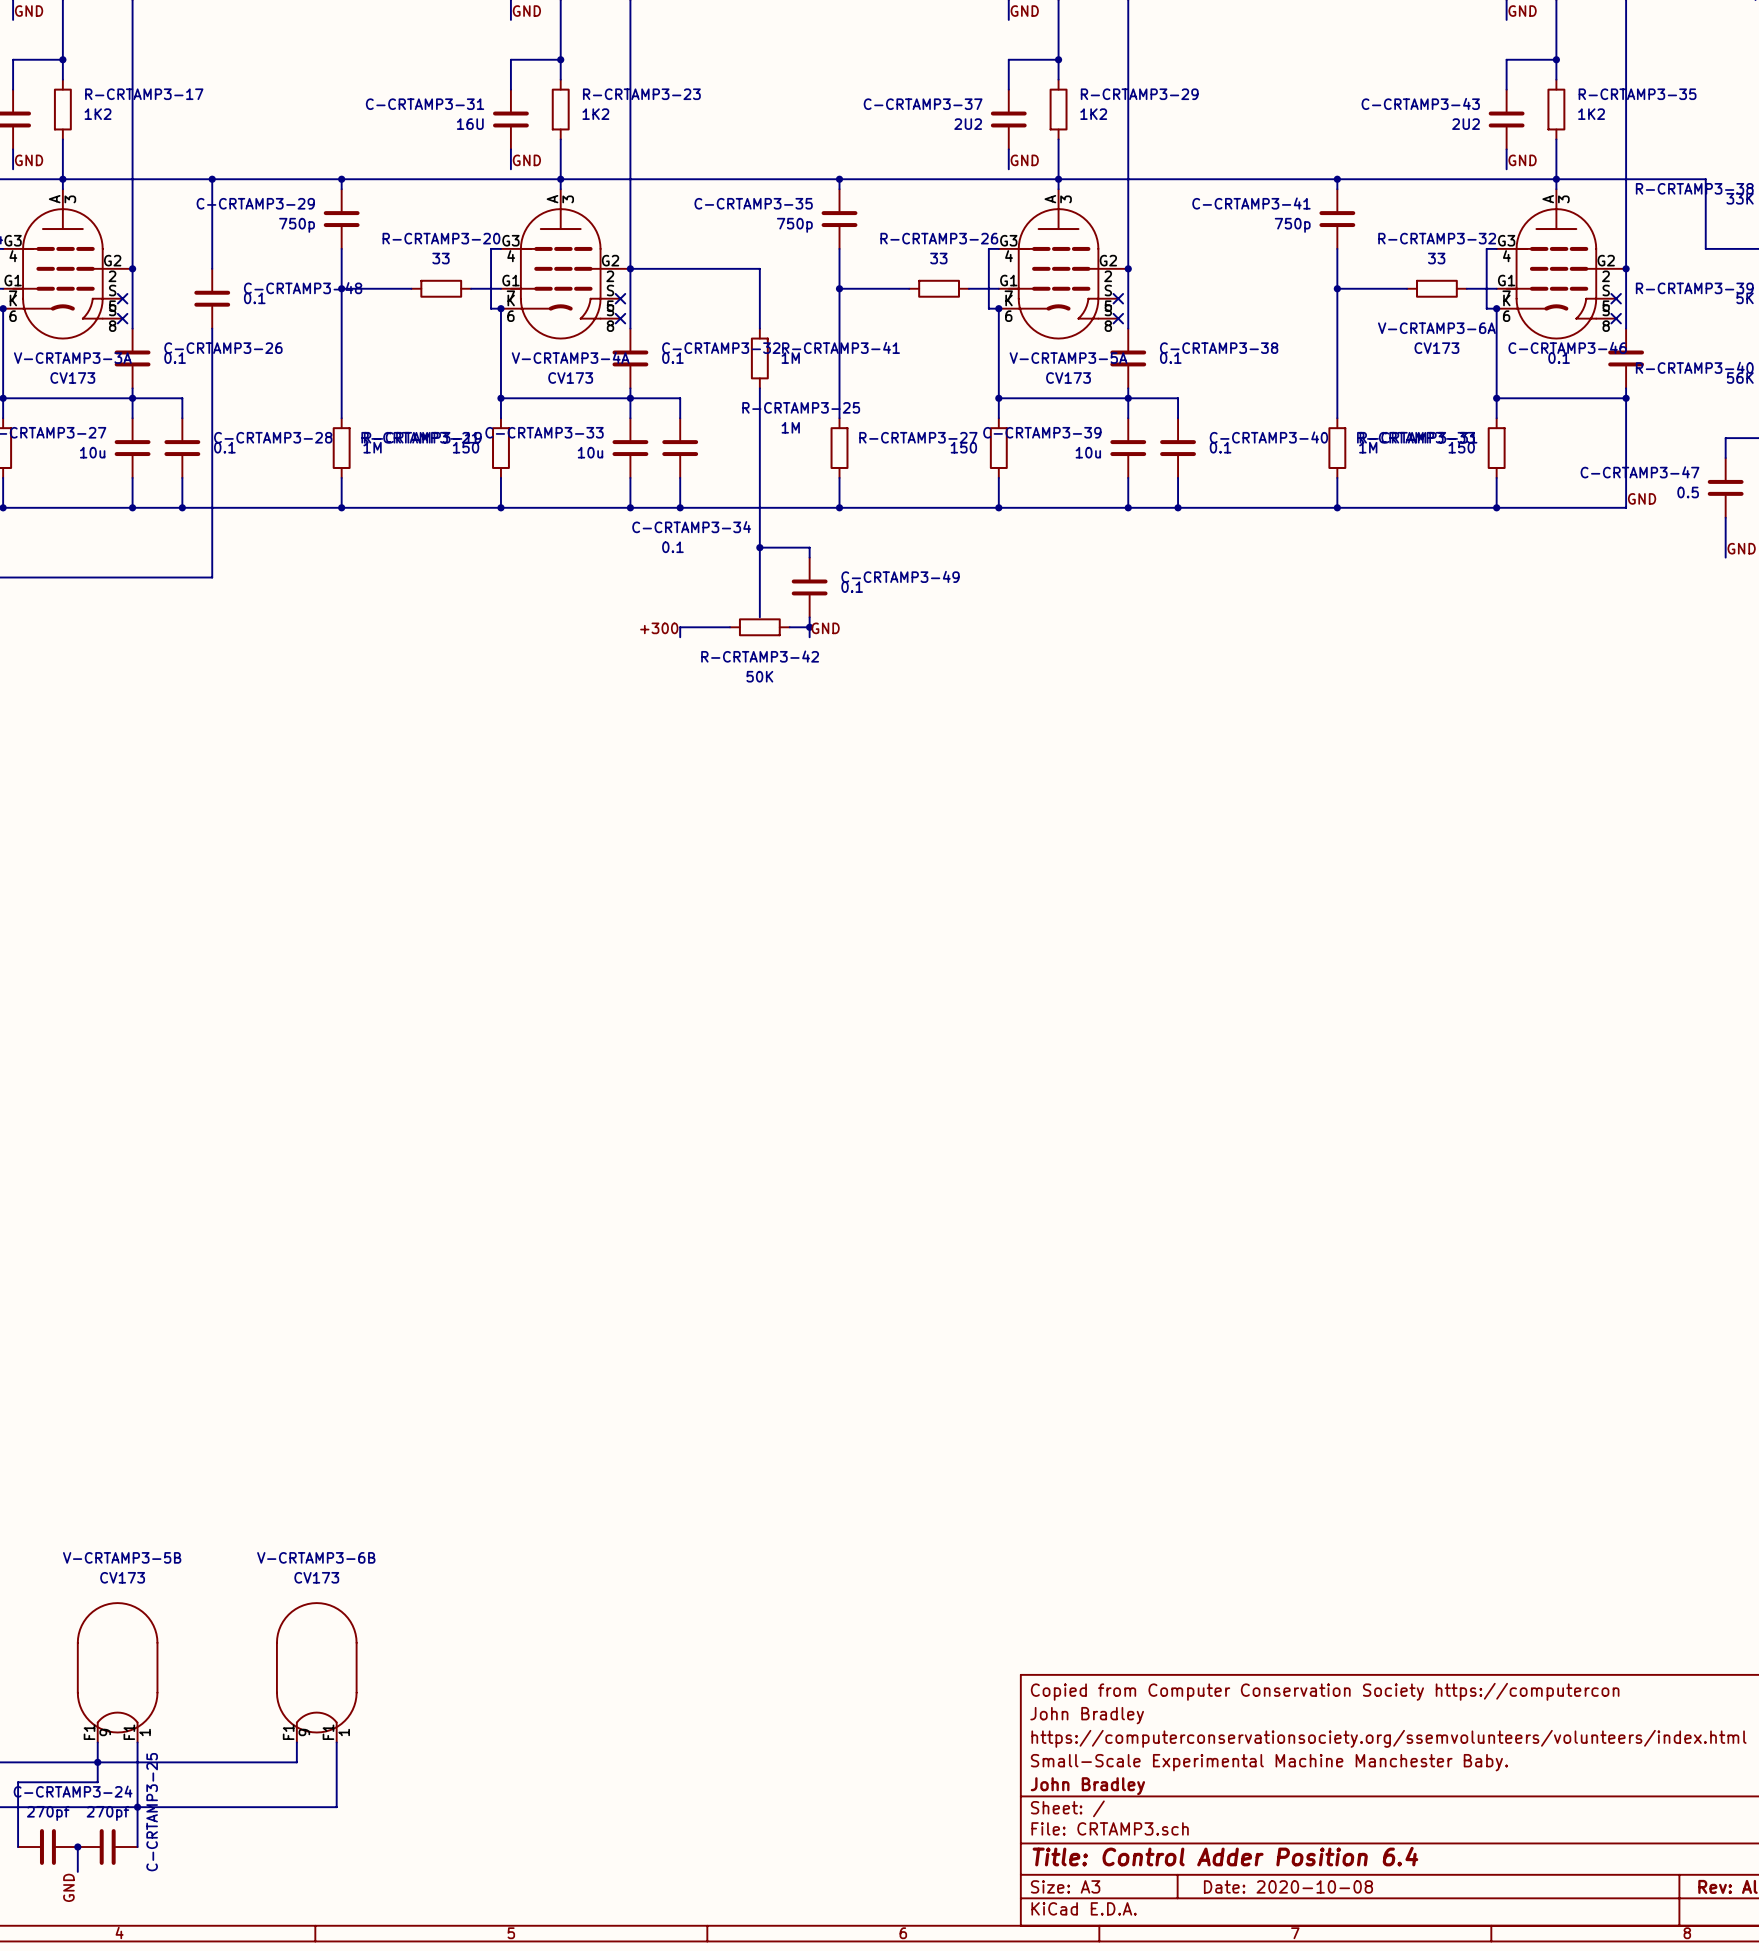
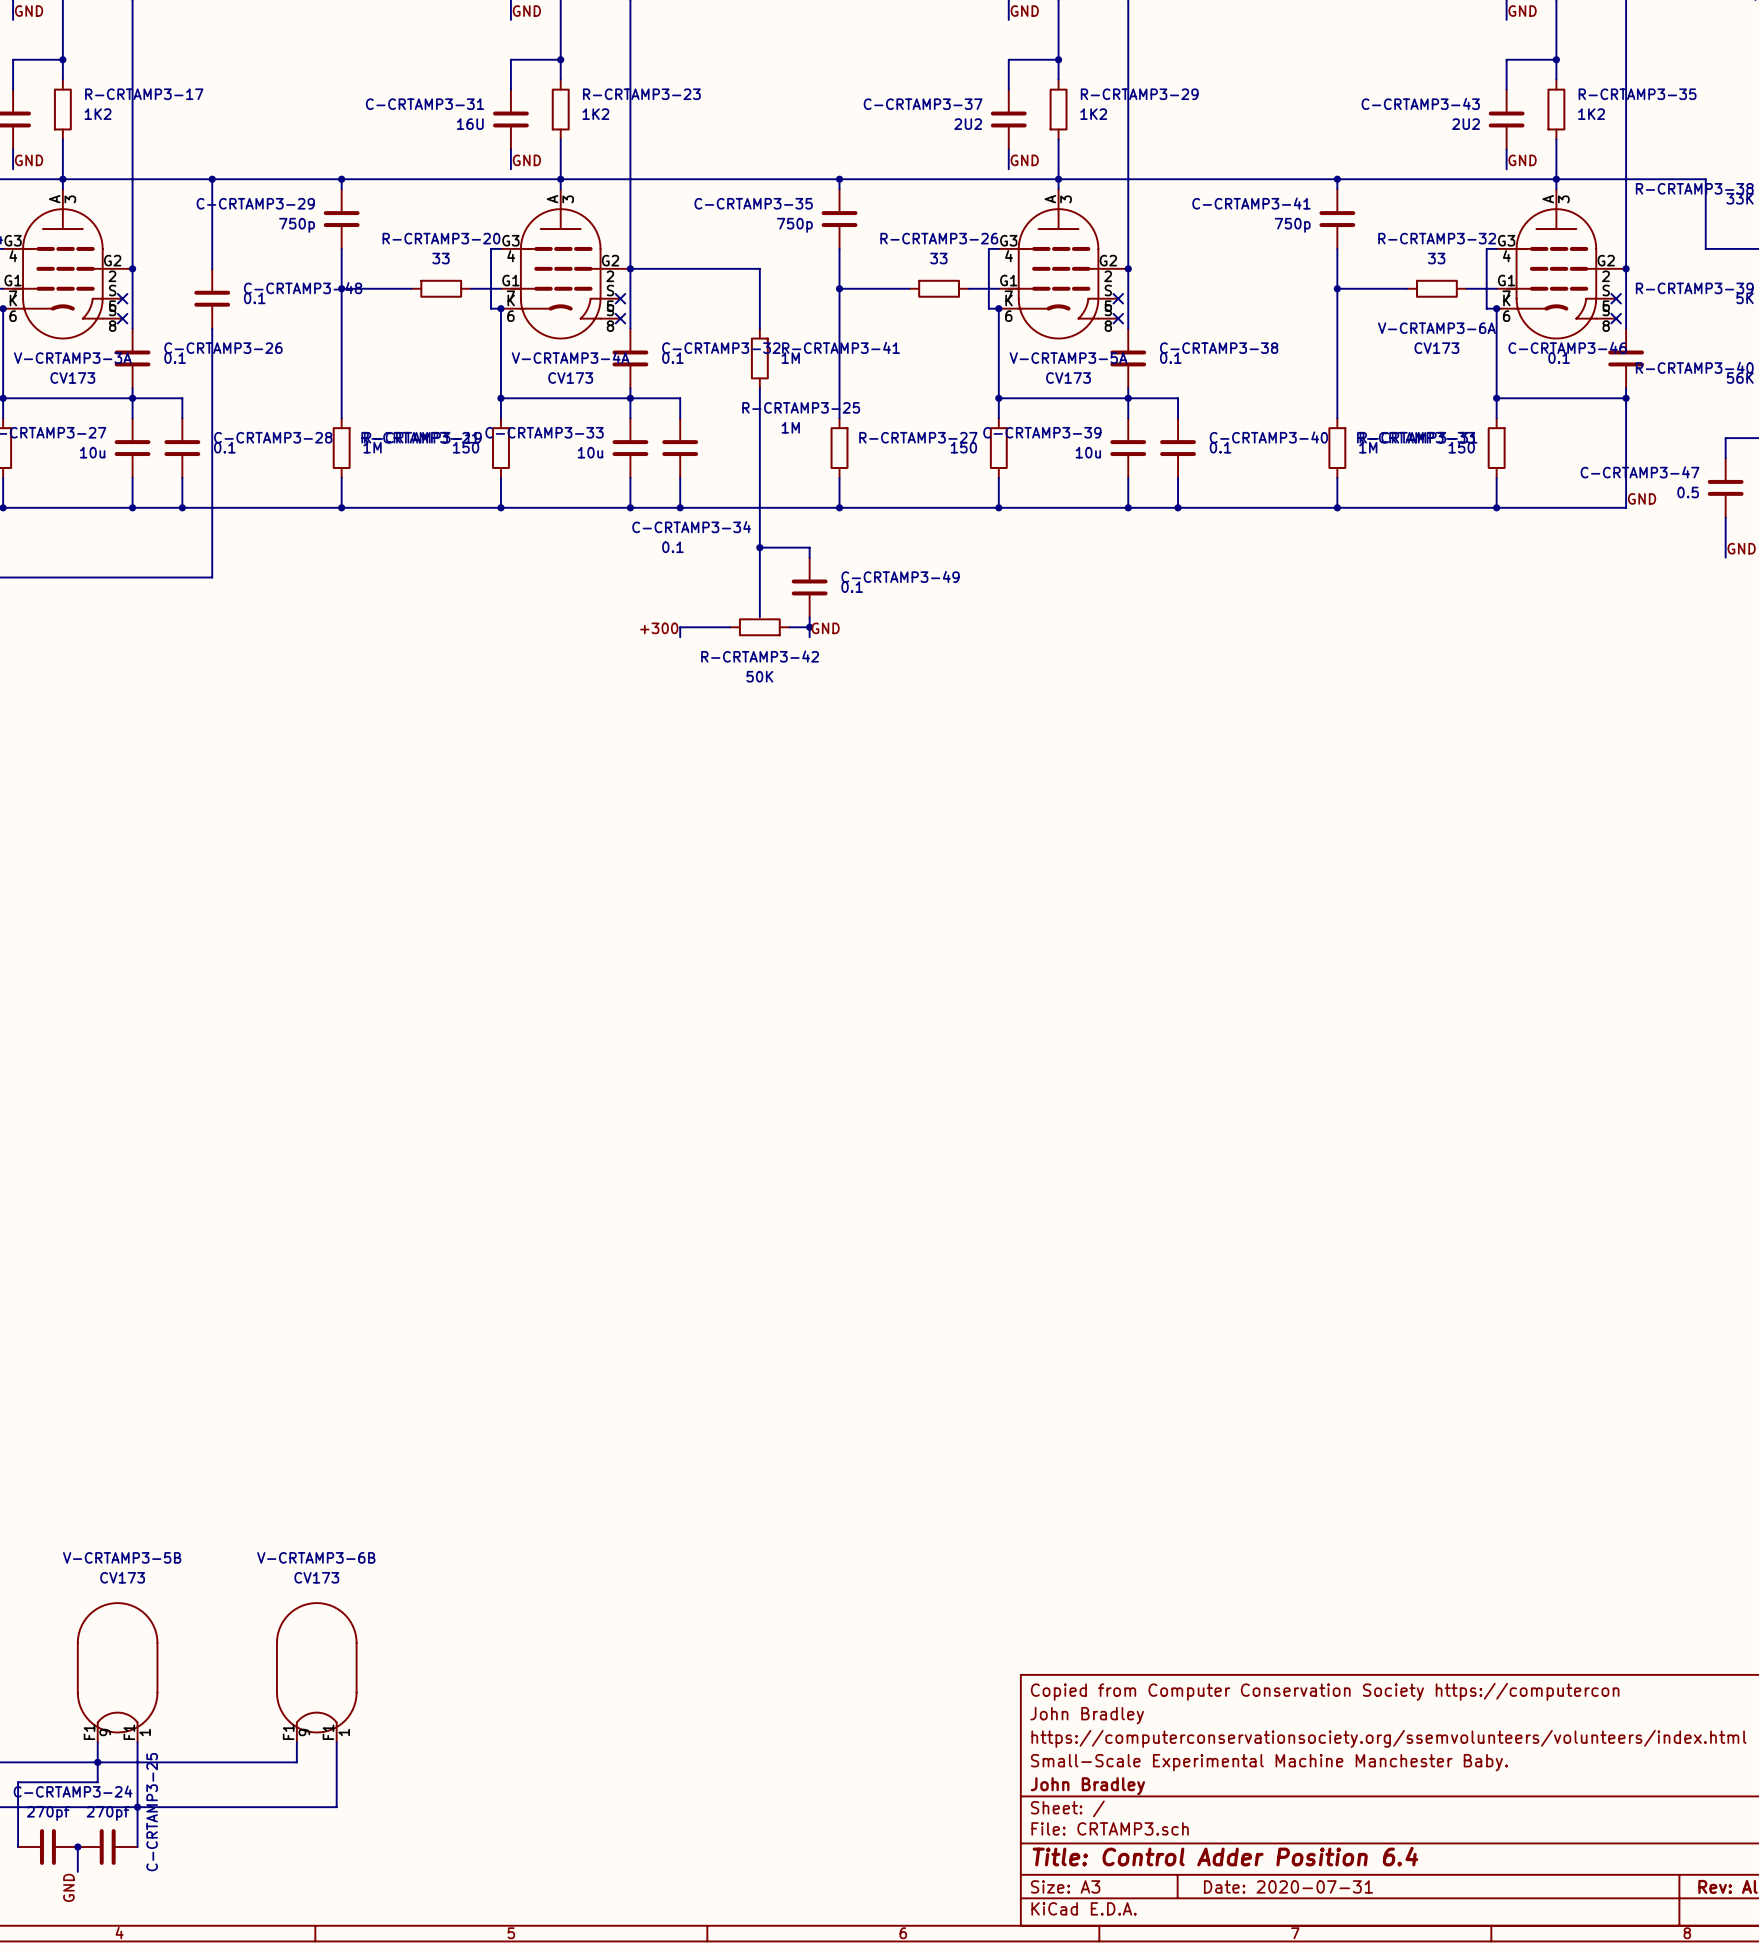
title block: Date: 2020-10-08 (1288, 1886) -> Date: 2020-07-31 (1288, 1886)

